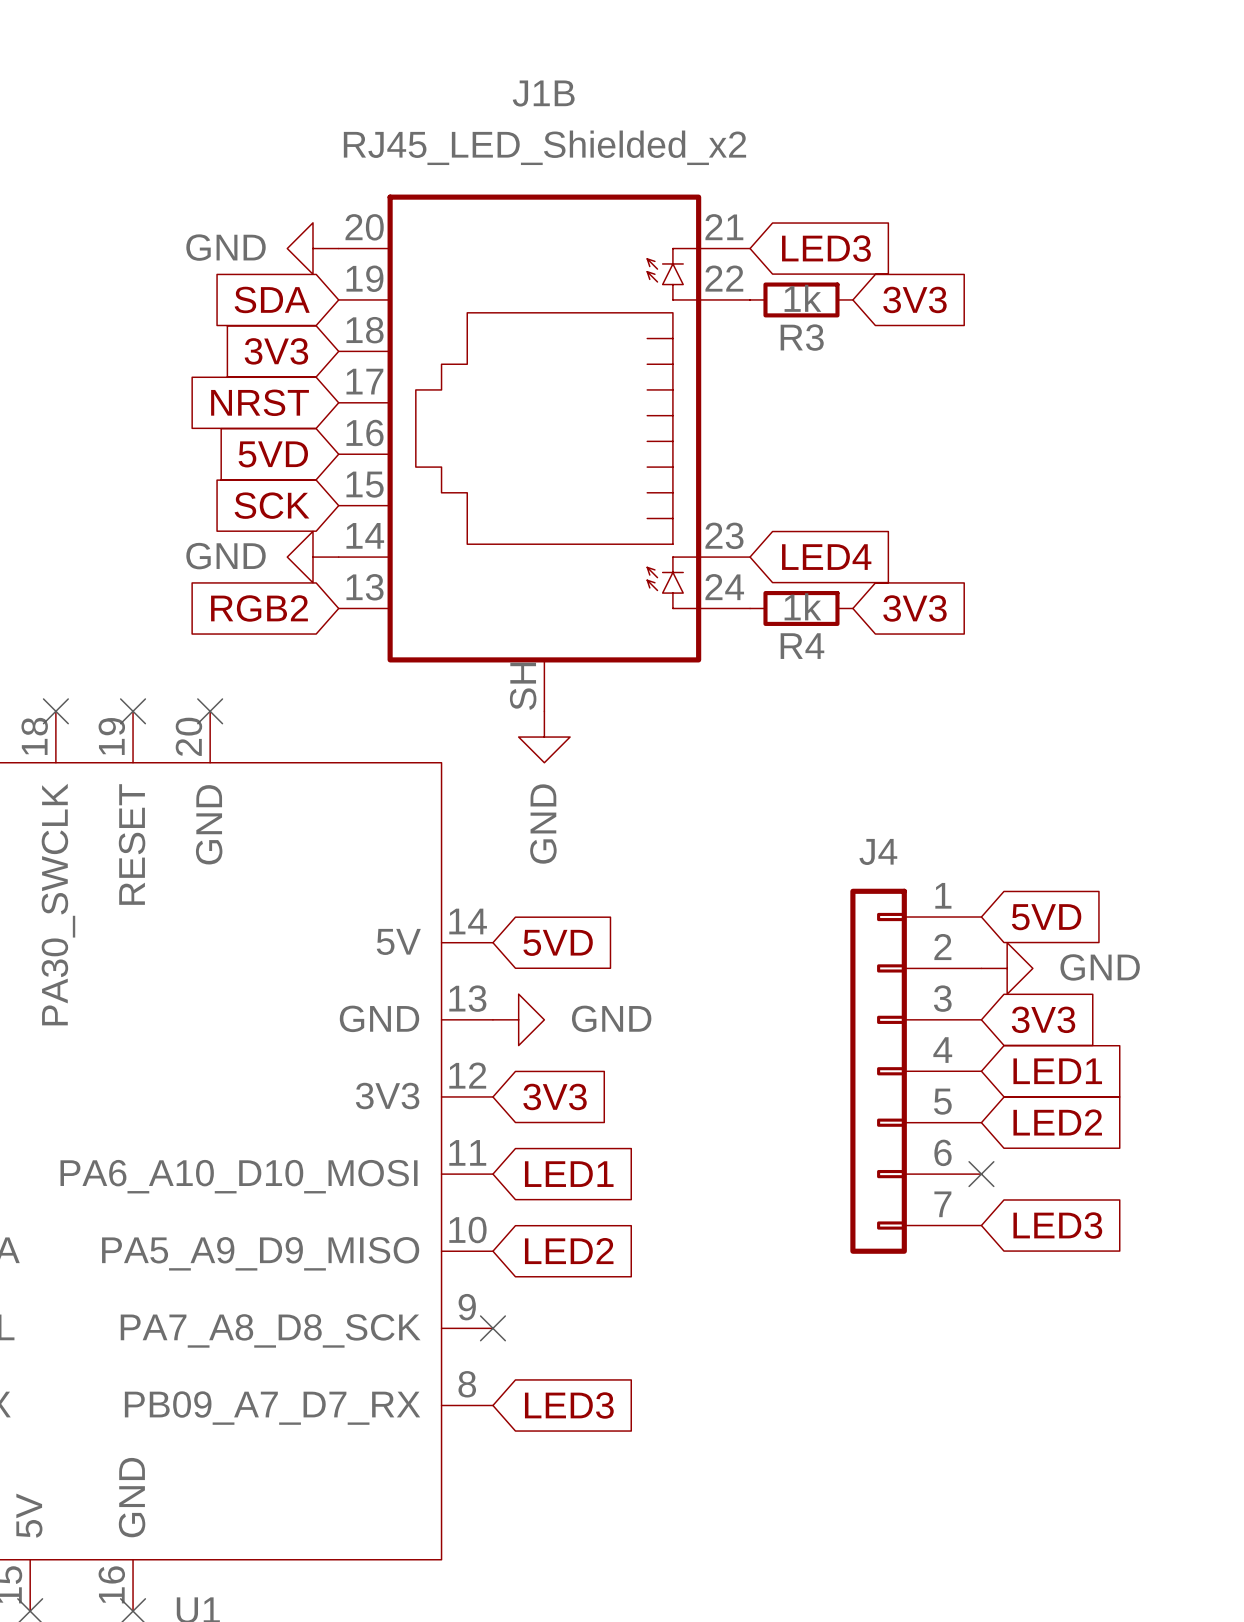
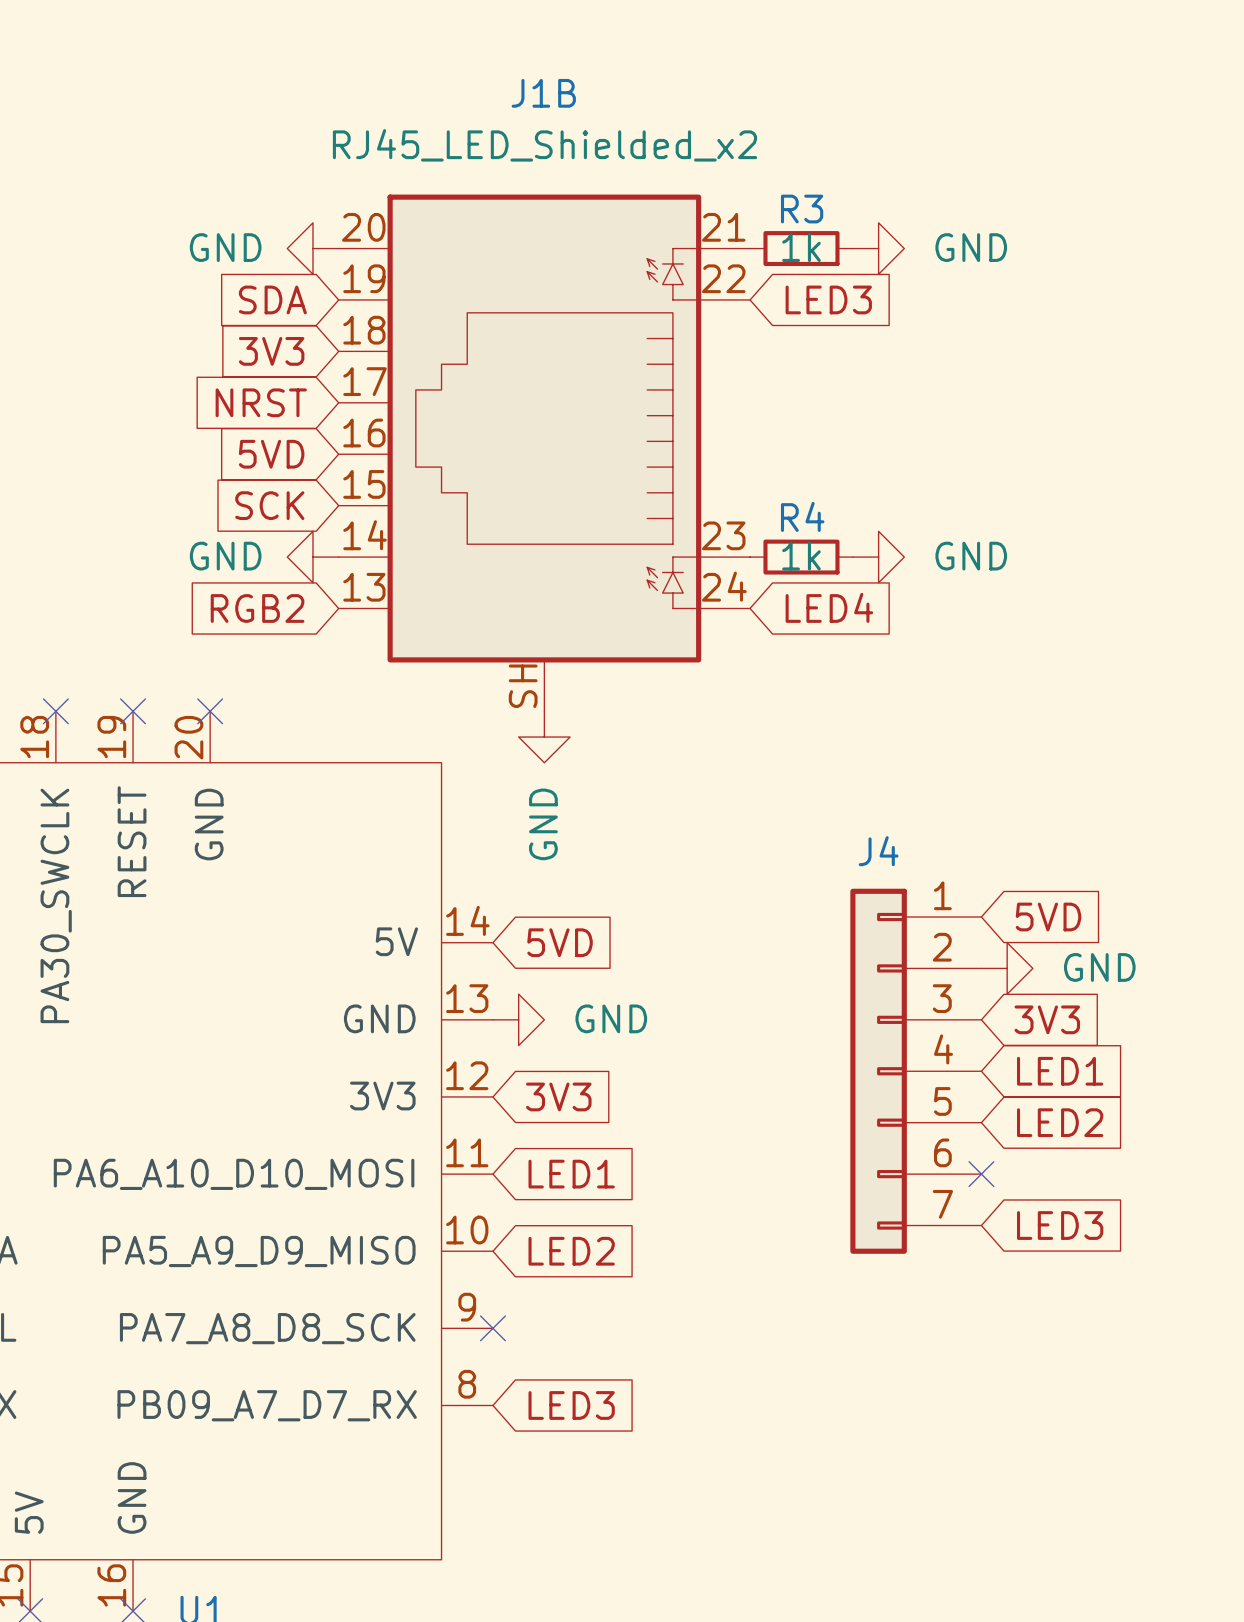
global label position: LED3 (826, 248) -> LED3 (828, 299)
power symbol: none -> GND (878, 248)
R3 position: (801, 299) -> (801, 248)
global label: 3V3 (914, 299) -> none
R3 name position: R3 (802, 337) -> R3 (802, 209)
global label position: LED4 (826, 557) -> LED4 (829, 607)
power symbol: none -> GND (878, 557)
R4 position: (801, 608) -> (801, 557)
global label: 3V3 (914, 608) -> none
R4 name position: R4 (802, 646) -> R4 (802, 516)

